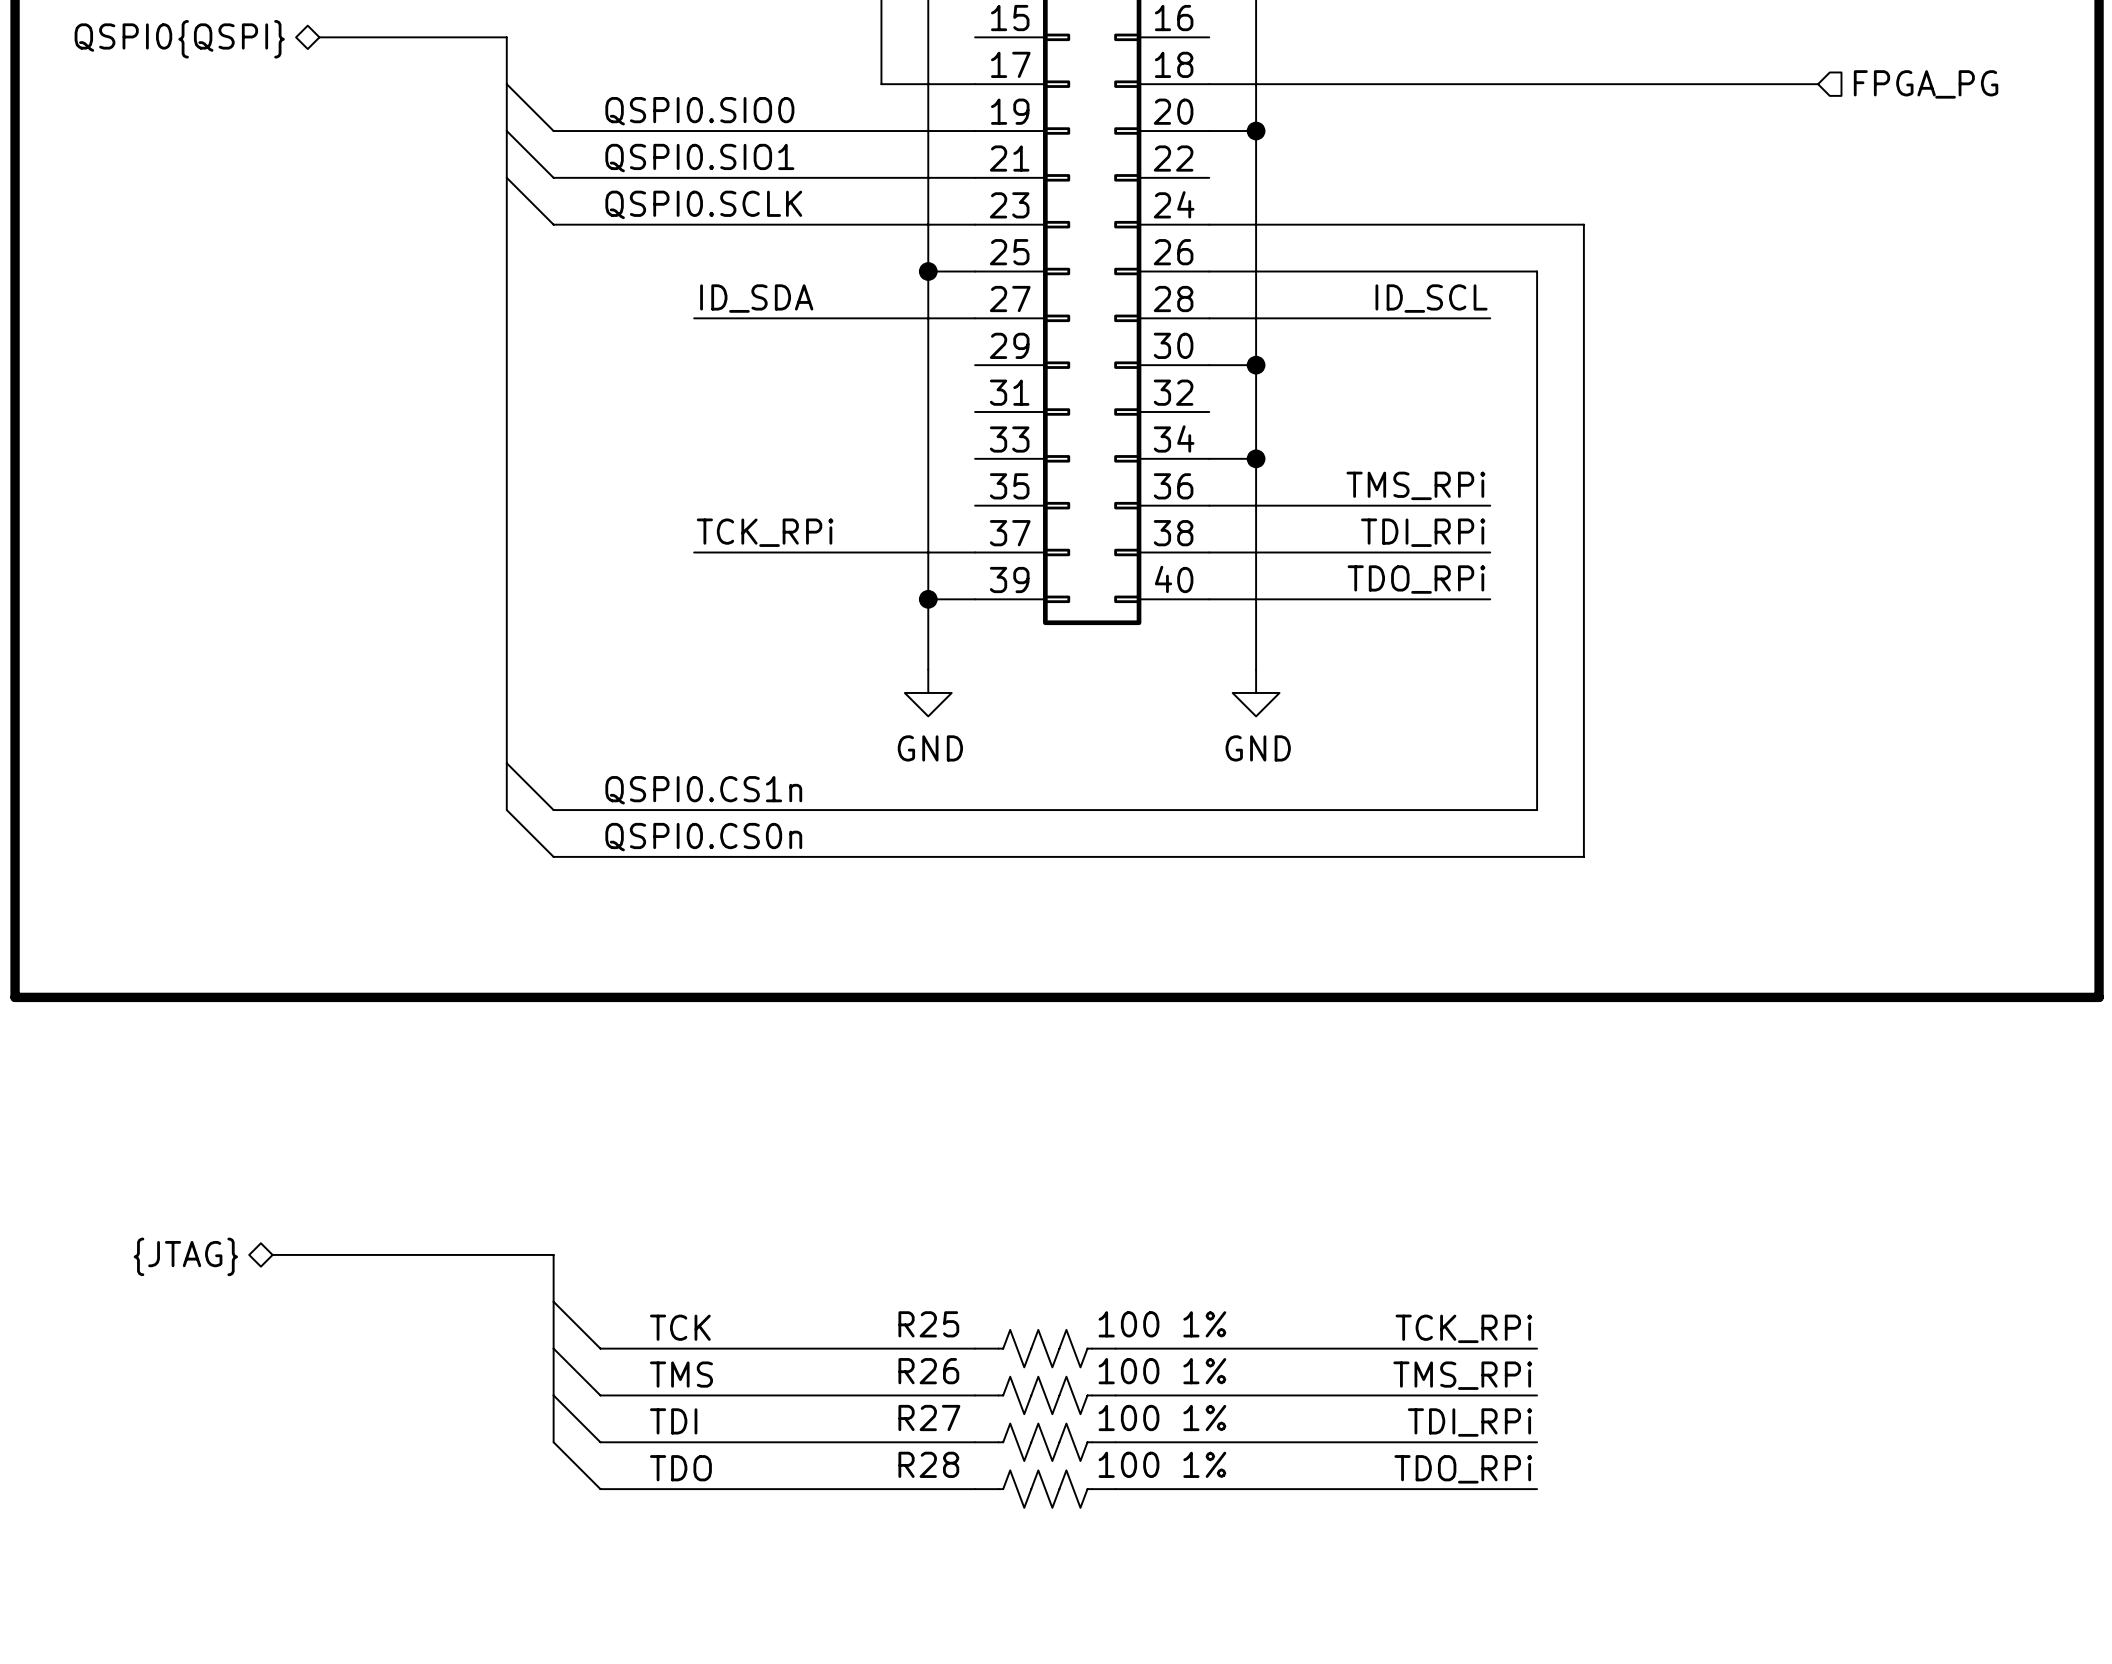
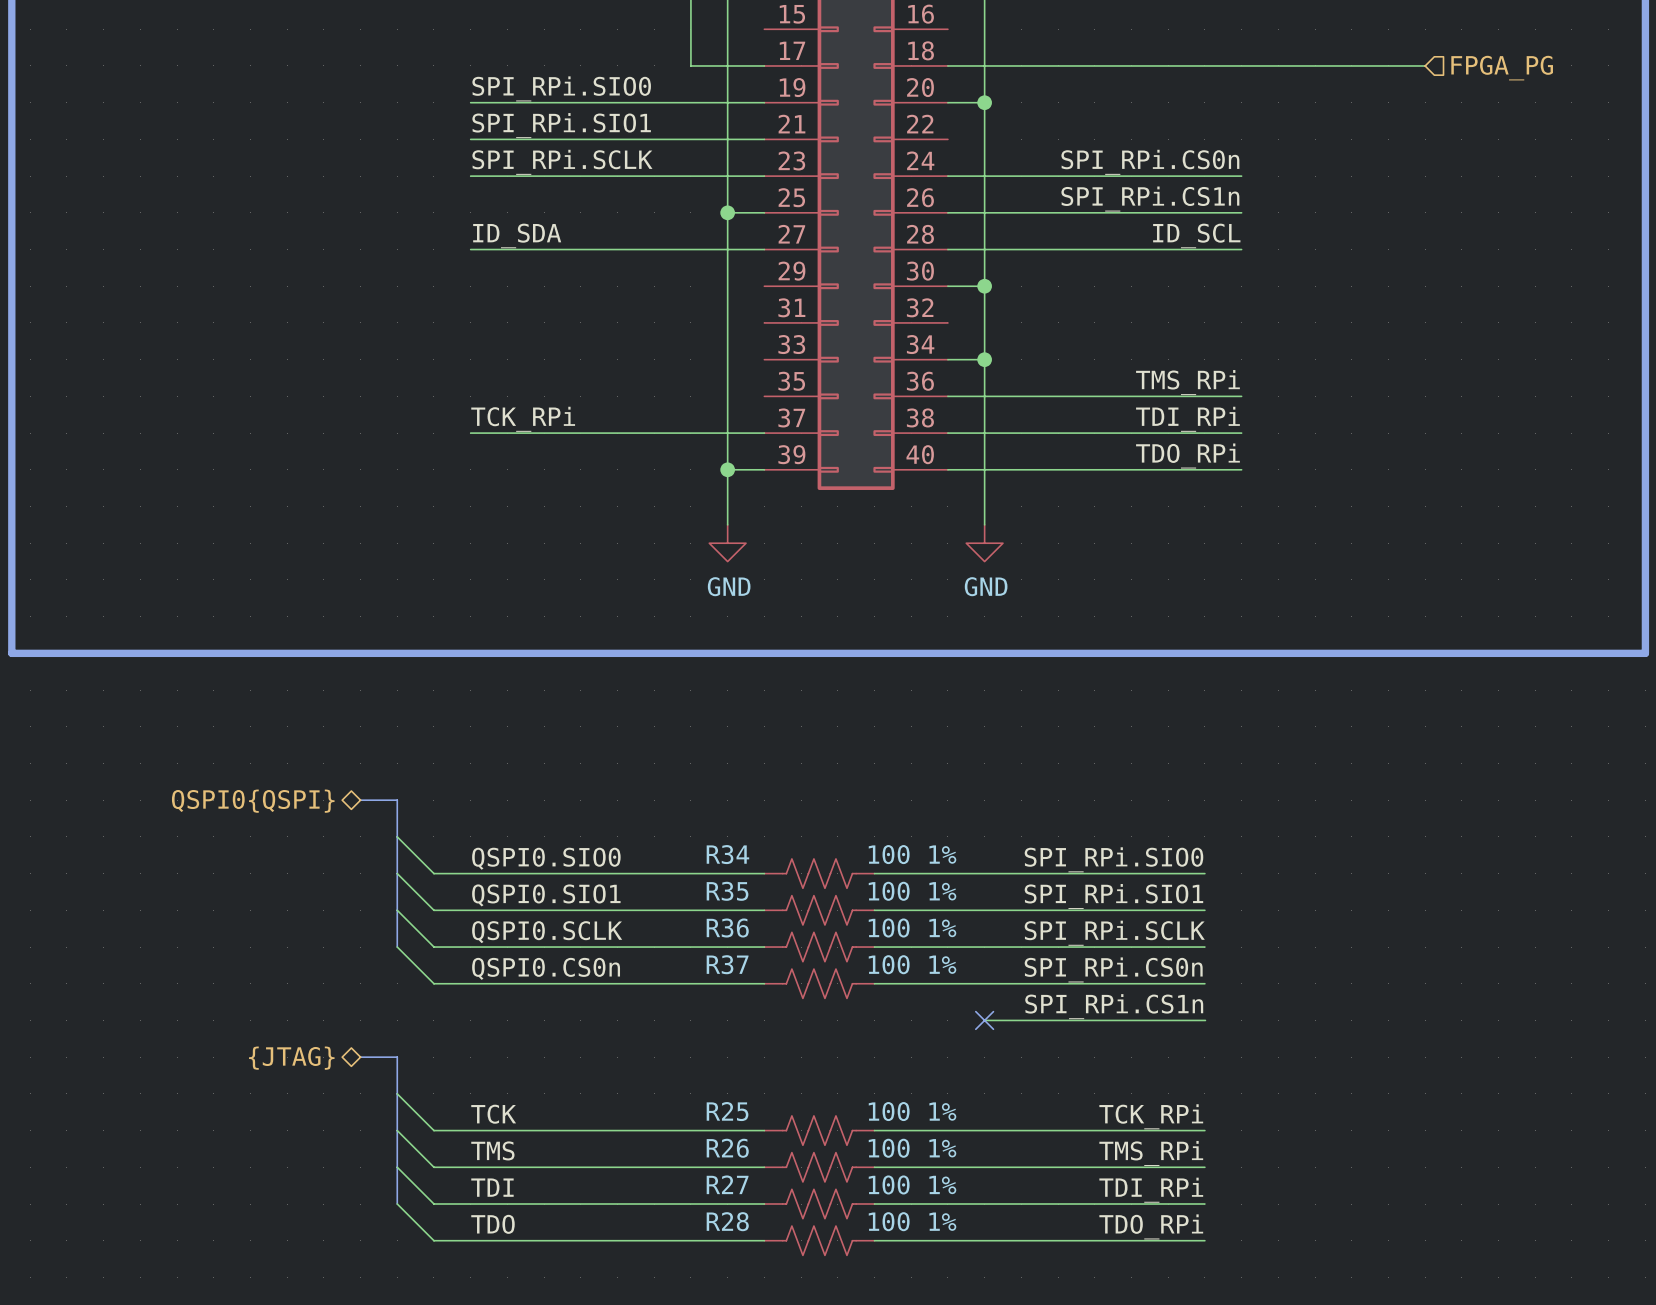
bus: (319, 37) (506, 37) (506, 810) -> none
hierarchical label: QSPI0{QSPI} (179, 39) -> none
wire: (506, 84) (553, 131) (600, 131) -> none
label: QSPI0.SIO0 (699, 111) -> SPI_RPi.SIO0 (561, 88)
wire: (506, 131) (553, 177) (600, 177) -> none
label: QSPI0.SIO1 (699, 158) -> SPI_RPi.SIO1 (561, 125)
wire: (506, 177) (553, 224) (600, 224) -> none
label: QSPI0.SCLK (703, 204) -> SPI_RPi.SCLK (562, 162)
label: none -> SPI_RPi.CS0n (1150, 162)
wire: (1583, 224) (1583, 856) (553, 856) (506, 810) -> none
label: none -> SPI_RPi.CS1n (1150, 199)
wire: (1537, 271) (1537, 810) (553, 810) (506, 763) -> (1204, 212) (1241, 212)
label position: ID_SDA (756, 298) -> ID_SDA (517, 235)
label position: ID_SCL (1431, 298) -> ID_SCL (1196, 235)
wire: none -> (470, 249) (544, 249)
wire: none -> (1168, 249) (1241, 249)
label position: TMS_RPi (1415, 485) -> TMS_RPi (1187, 382)
wire: none -> (1168, 396) (1241, 396)
label position: TCK_RPi (765, 532) -> TCK_RPi (523, 419)
label position: TDI_RPi (1423, 532) -> TDI_RPi (1187, 419)
wire: none -> (470, 433) (544, 433)
wire: none -> (1168, 433) (1241, 433)
label position: TDO_RPi (1416, 579) -> TDO_RPi (1187, 456)
wire: none -> (1168, 469) (1241, 469)
label: QSPI0.CS1n (703, 790) -> none
line: (15, 833) (15, 997) (2099, 997) (2099, 833) -> (11, 653) (1645, 653)
label position: QSPI0.CS0n (703, 837) -> QSPI0.CS0n (546, 968)
bus: none -> (360, 800) (397, 800) (397, 947)
hierarchical label: none -> QSPI0{QSPI} (253, 801)
wire: none -> (397, 836) (433, 873) (764, 873)
label: none -> QSPI0.SIO0 (546, 858)
label: none -> SPI_RPi.SIO0 (1113, 859)
wire: none -> (397, 873) (433, 910) (764, 910)
R34: none -> 100 1% (819, 873)
wire: none -> (874, 873) (1204, 873)
label: none -> QSPI0.SIO1 (546, 895)
label: none -> SPI_RPi.SIO1 (1113, 896)
wire: none -> (397, 910) (433, 947) (764, 947)
R35: none -> 100 1% (819, 910)
wire: none -> (874, 910) (1204, 910)
label: none -> QSPI0.SCLK (547, 932)
label: none -> SPI_RPi.SCLK (1114, 933)
wire: none -> (397, 947) (433, 983) (764, 983)
R36: none -> 100 1% (819, 947)
label: none -> SPI_RPi.CS0n (1113, 969)
bus: (272, 1254) (553, 1254) (553, 1442) -> none
R37: none -> 100 1% (819, 983)
hierarchical label position: {JTAG} (185, 1256) -> {JTAG} (291, 1058)
label: none -> SPI_RPi.CS1n (1114, 1006)
wire: (553, 1301) (600, 1348) (975, 1348) -> none
wire: none -> (984, 1020) (1205, 1020)
no-connect mark: none -> (984, 1020)
label position: TCK (680, 1327) -> TCK (493, 1114)
label: TCK_RPi (1463, 1328) -> none
bus: none -> (360, 1057) (397, 1057) (397, 1204)
wire: (553, 1348) (600, 1395) (975, 1395) -> none
R25: 100 1% (1045, 1348) -> none
wire: (1115, 1348) (1537, 1348) -> (874, 947) (1204, 947)
label position: TMS (681, 1374) -> TMS (492, 1150)
label: TMS_RPi (1462, 1375) -> none
wire: (553, 1395) (600, 1442) -> (397, 1093) (433, 1130) (470, 1130)
R26: 100 1% (1045, 1395) -> none
wire: (1115, 1395) (1537, 1395) -> (874, 983) (1204, 983)
R27 name: R27 (929, 1418) -> R25 (727, 1111)
label position: TDI (673, 1421) -> TDI (492, 1187)
label: TDI_RPi (1470, 1422) -> TCK_RPi (1151, 1116)
wire: (553, 1442) (600, 1489) -> (397, 1130) (433, 1167) (470, 1167)
R28 name: R28 (928, 1464) -> R26 (727, 1148)
label position: TDO (680, 1468) -> TDO (492, 1224)
label: TDO_RPi (1463, 1469) -> TMS_RPi (1151, 1153)
wire: none -> (397, 1167) (433, 1204) (764, 1204)
label: none -> TDI_RPi (1151, 1190)
wire: none -> (397, 1204) (433, 1240) (764, 1240)
R27: none -> 100 1% (819, 1204)
wire: none -> (874, 1204) (1204, 1204)
label: none -> TDO_RPi (1151, 1226)
R28: none -> 100 1% (819, 1240)
wire: none -> (874, 1240) (1204, 1240)

